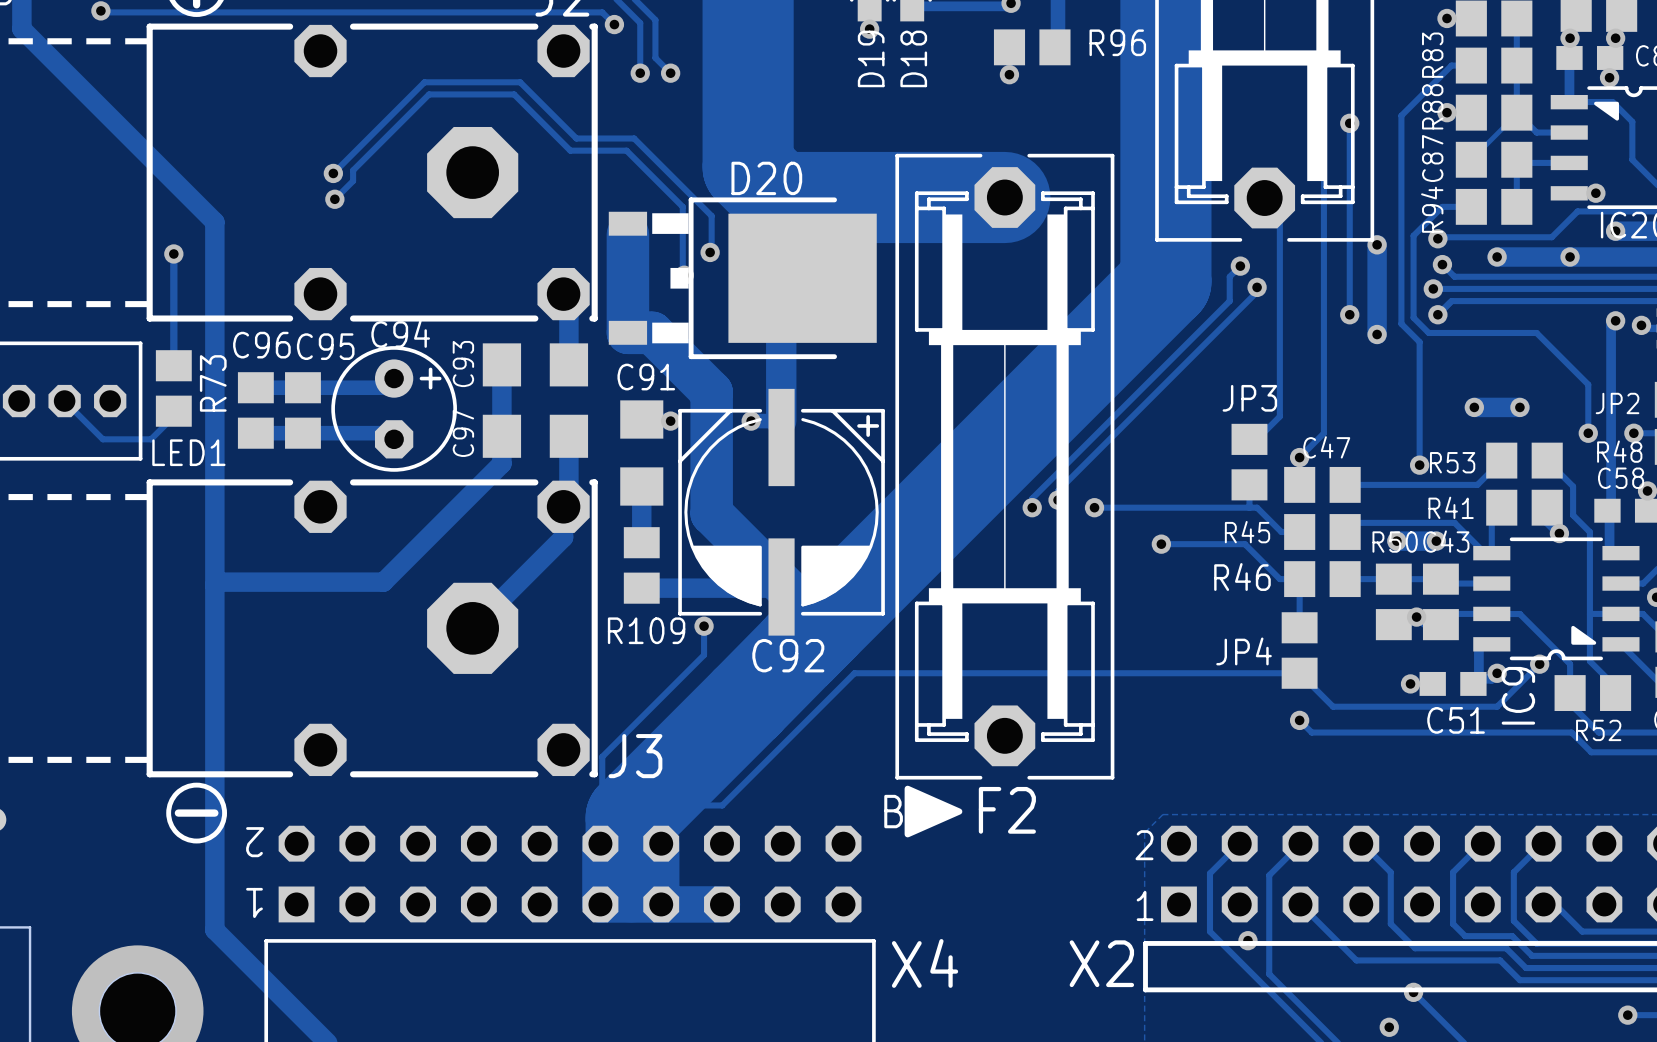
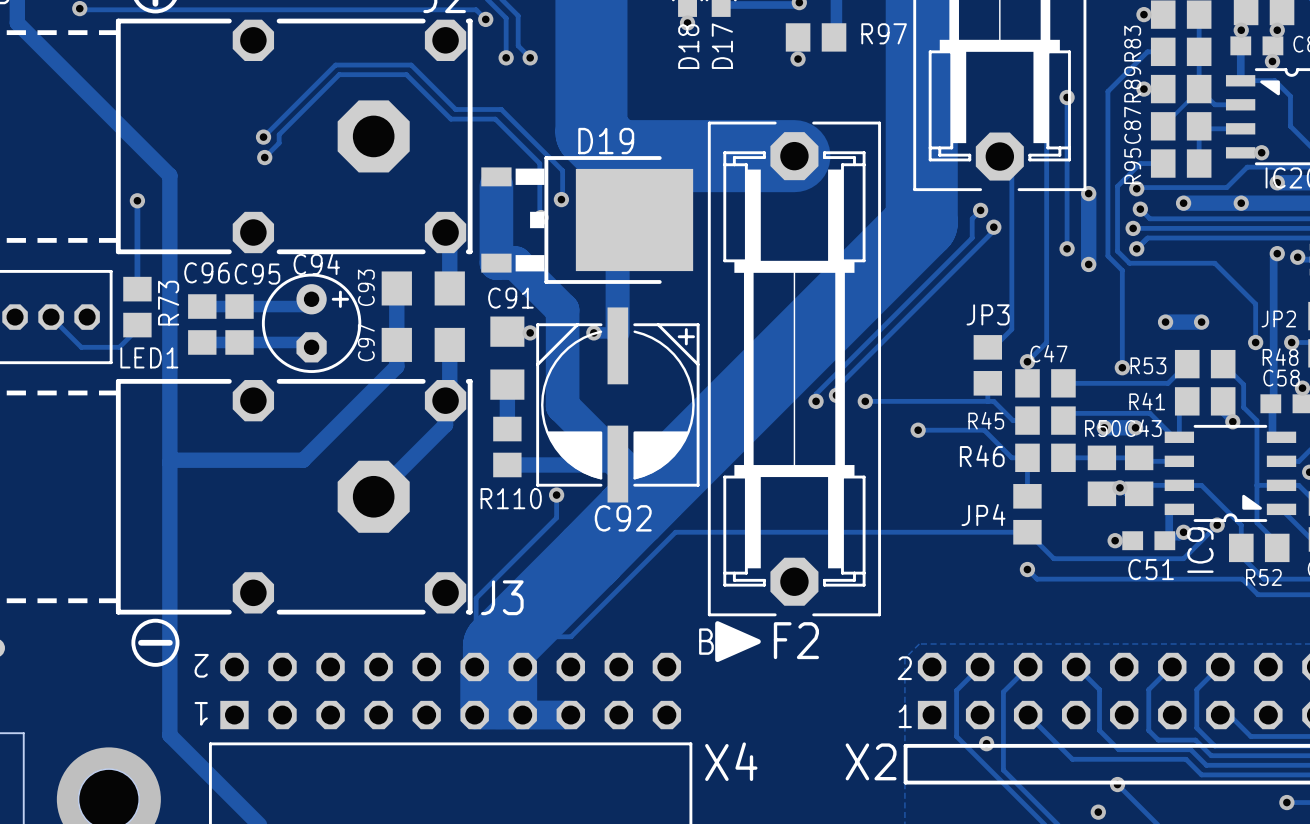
R96 name: R96 (1117, 42) -> R97 (884, 33)
D19 name: D19 (871, 58) -> D18 (688, 46)
D18 name: D18 (913, 58) -> D17 (722, 46)
R88 name: R88 (1432, 106) -> R89 (1132, 84)
D20 name: D20 (766, 178) -> D19 (606, 141)
R94 name: R94 (1432, 209) -> R95 (1132, 166)
R109 name: R109 (646, 630) -> R110 (511, 498)

